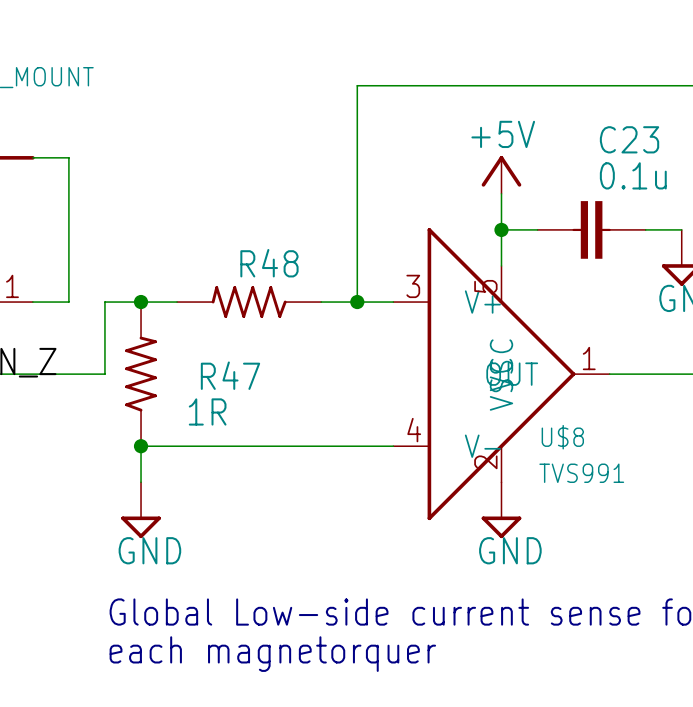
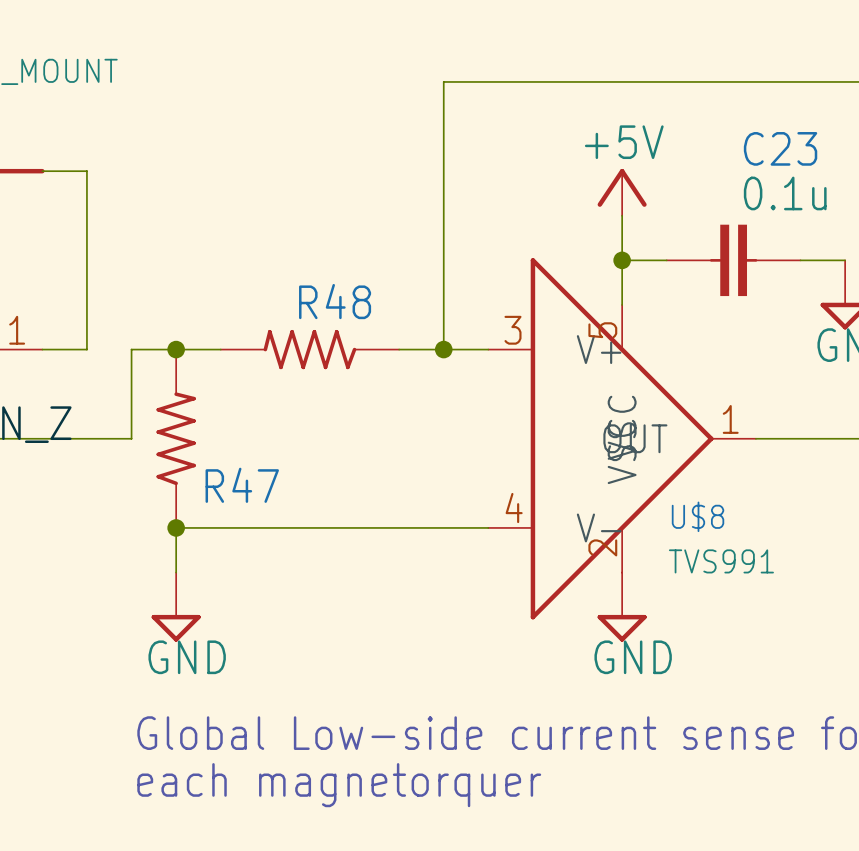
R47 name position: R47 (230, 375) -> R47 (242, 485)
R47 value: 1R (207, 411) -> none

